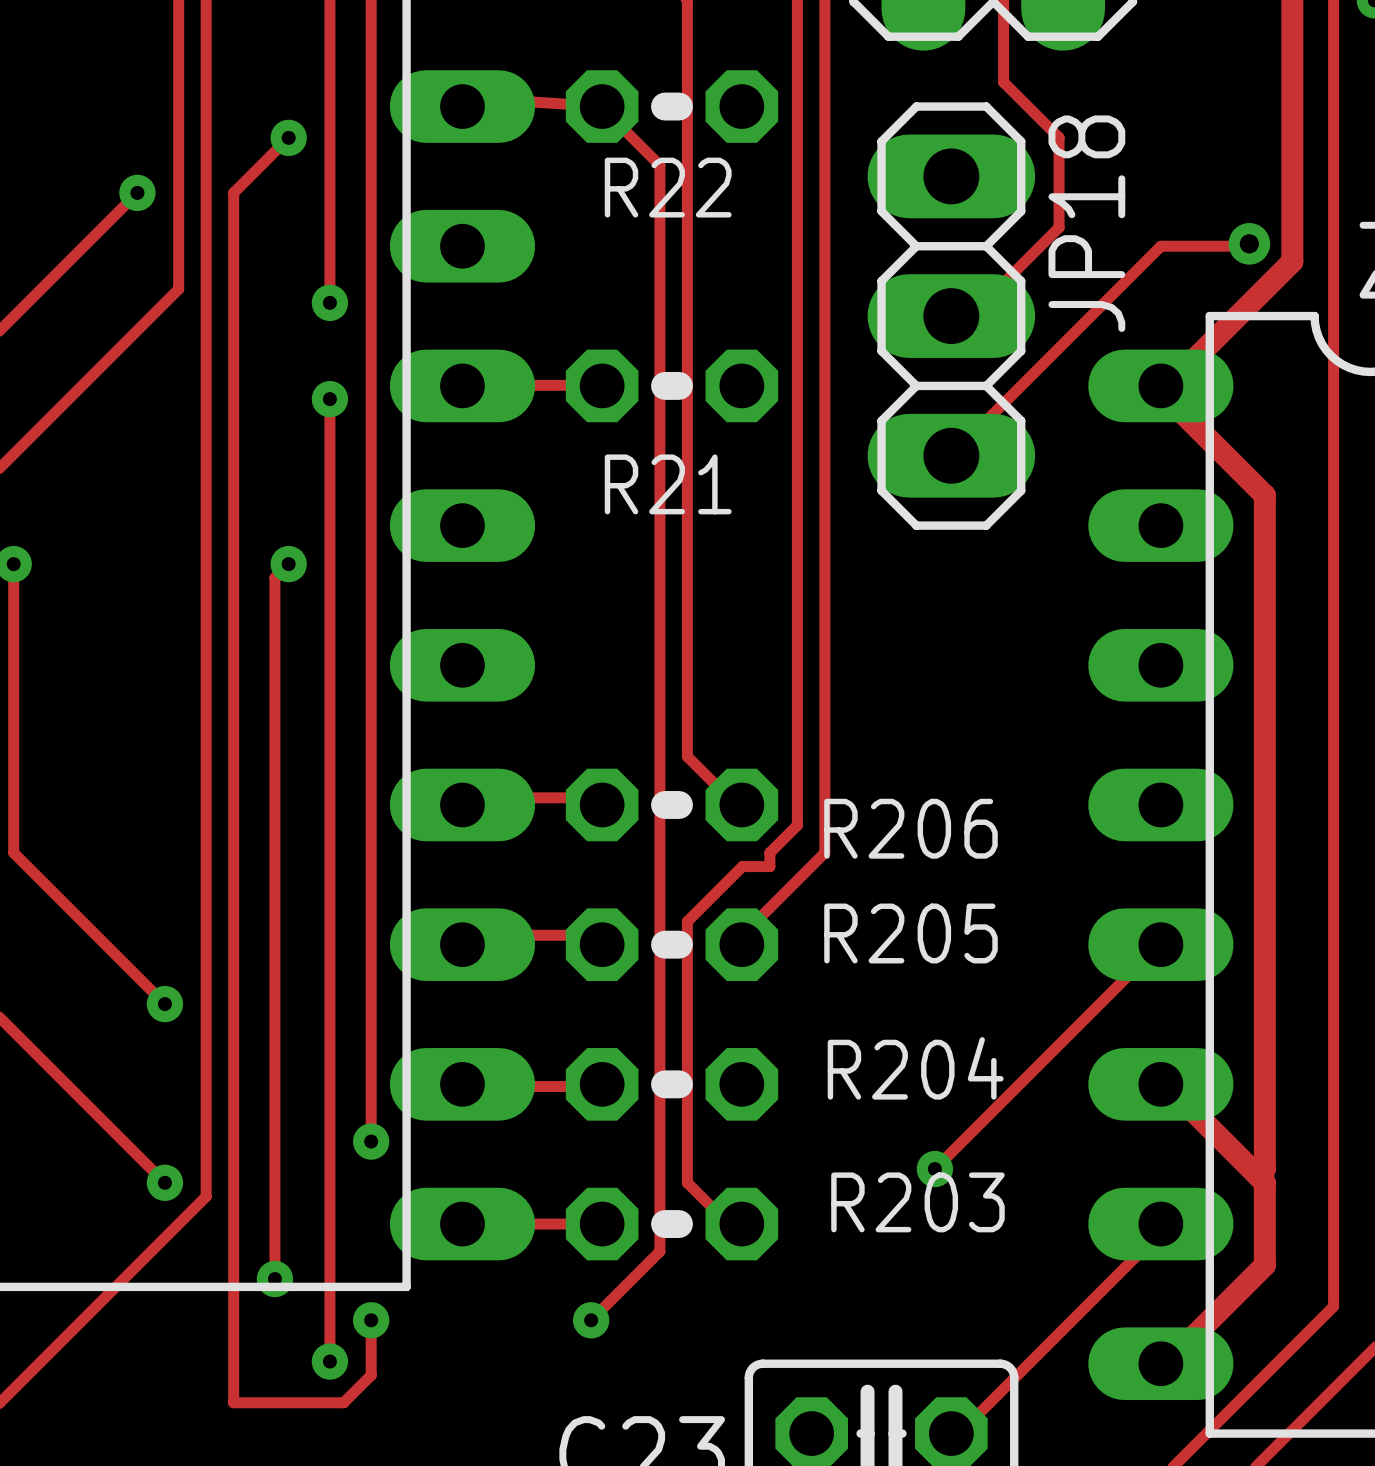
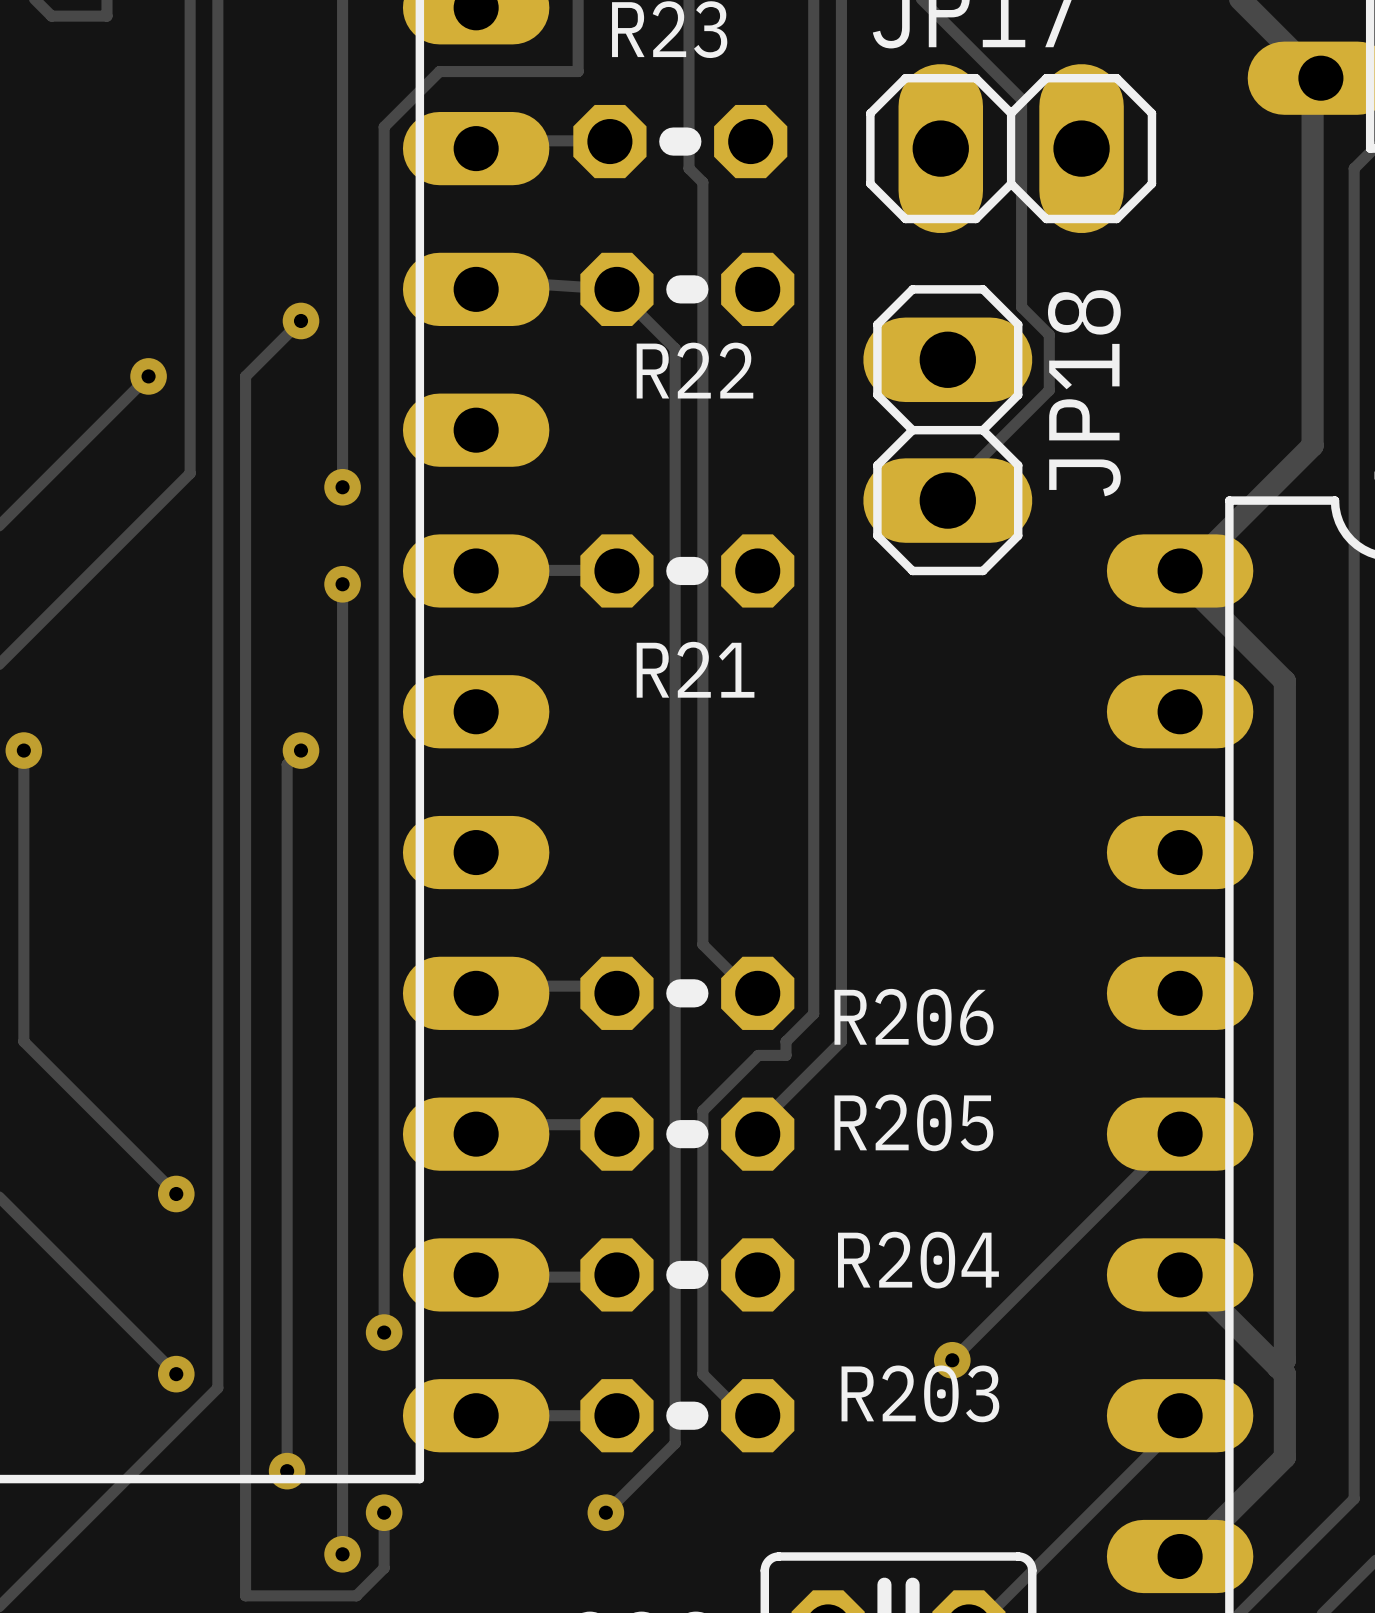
track: (1003, 82) (1059, 137) (1059, 227) (962, 323) (955, 316) (951, 316) -> (1021, 264) (1021, 307) (1049, 334) (1049, 390) (952, 487) (947, 500)
JP18 footprint: [867, 102, 1036, 530] -> [863, 285, 1033, 576]
track: (1249, 243) (1262, 243) (1264, 246) (1160, 246) (951, 455) -> none
via: (1249, 243) -> none

